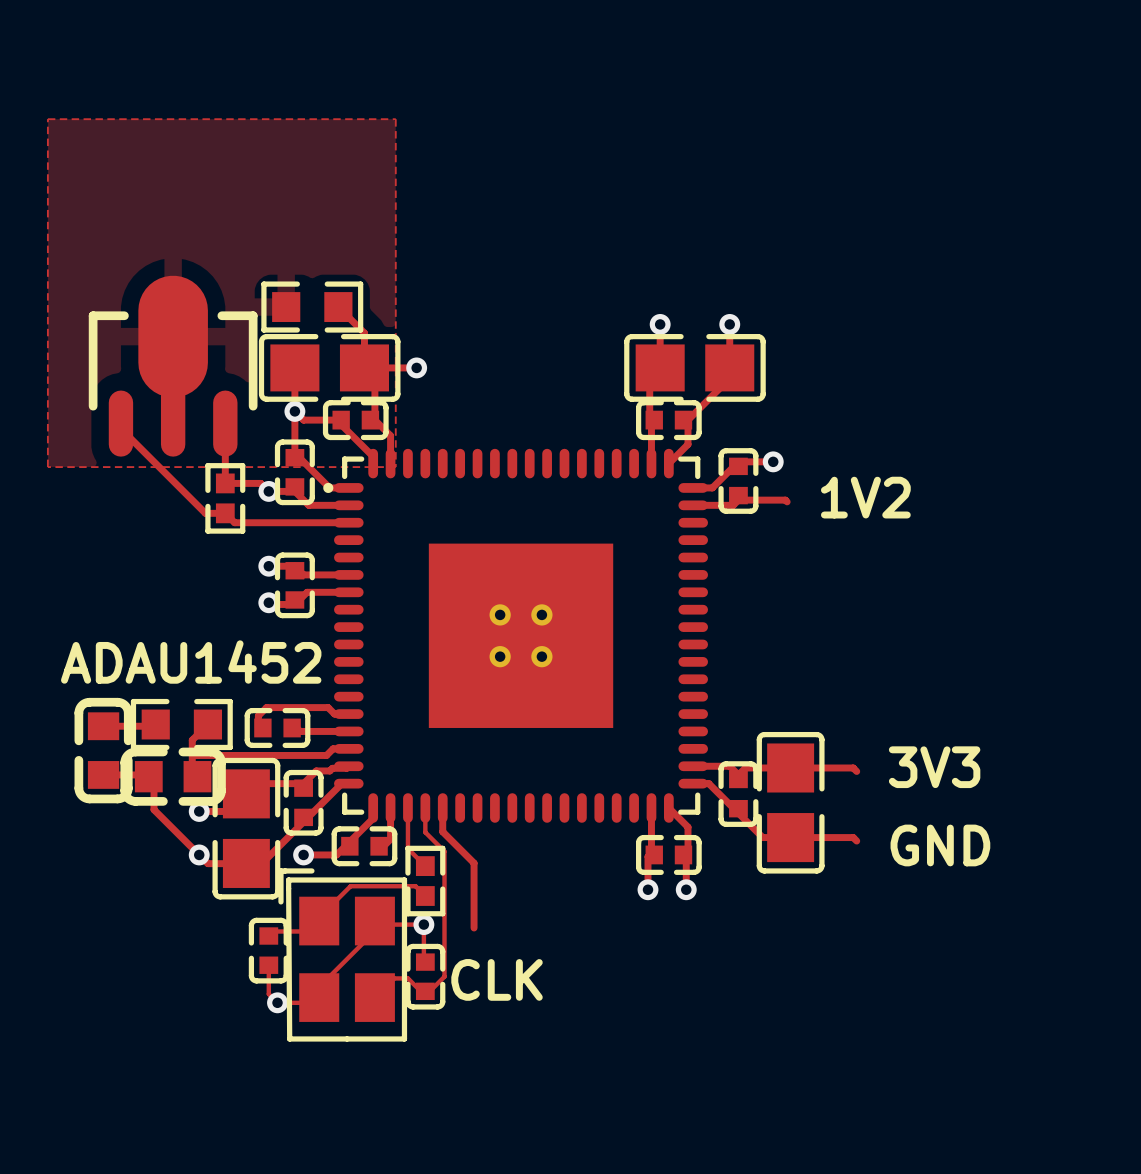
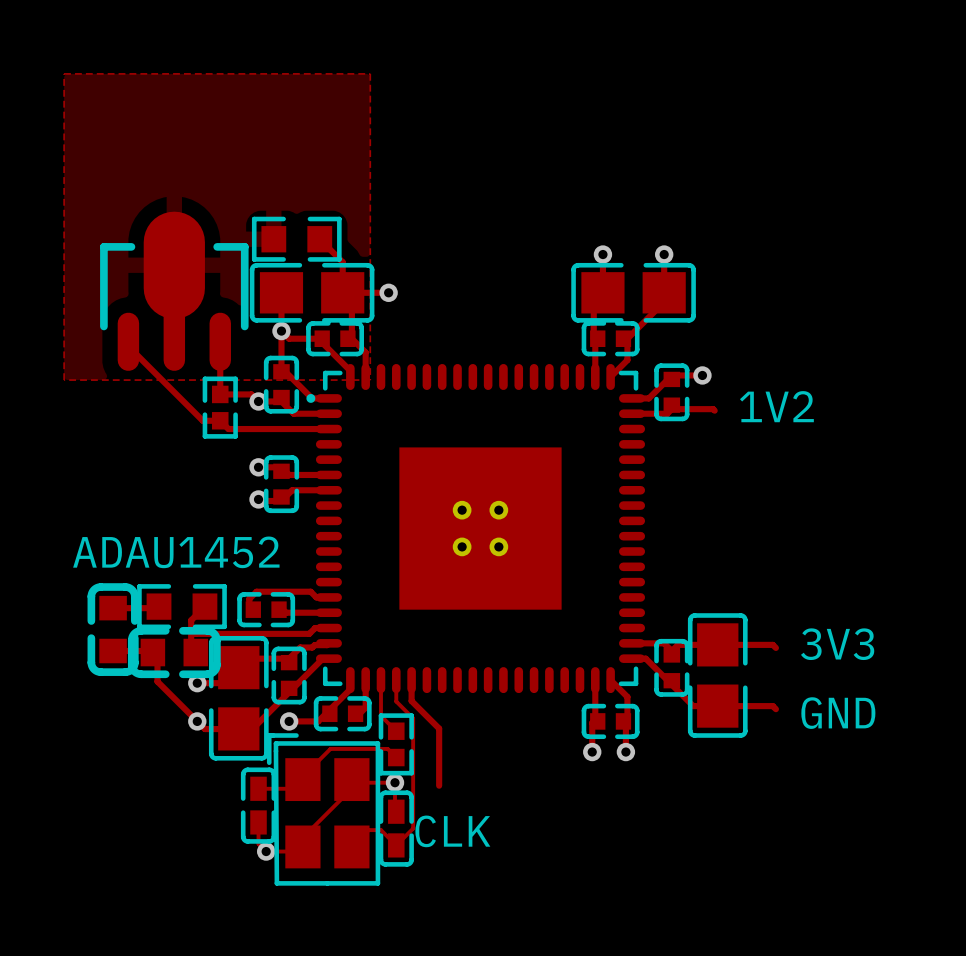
part footprint: [248, 917, 289, 984] -> [240, 767, 277, 844]
part footprint: [405, 943, 446, 1010] -> [378, 790, 414, 867]

